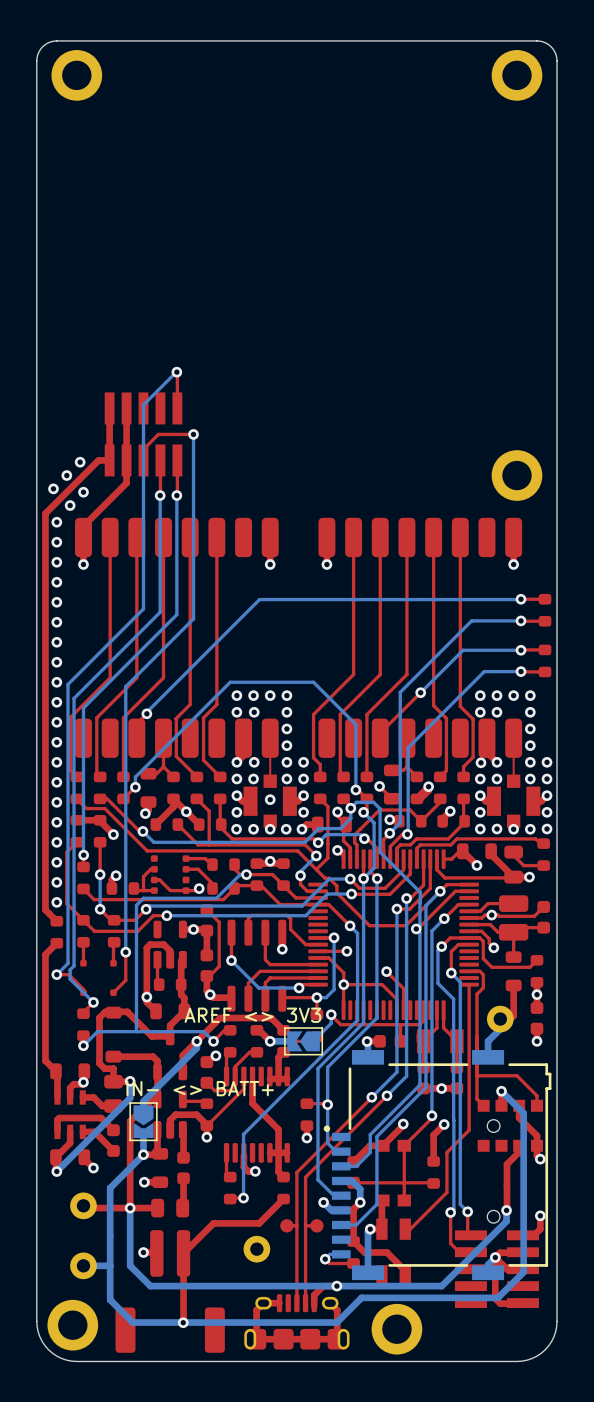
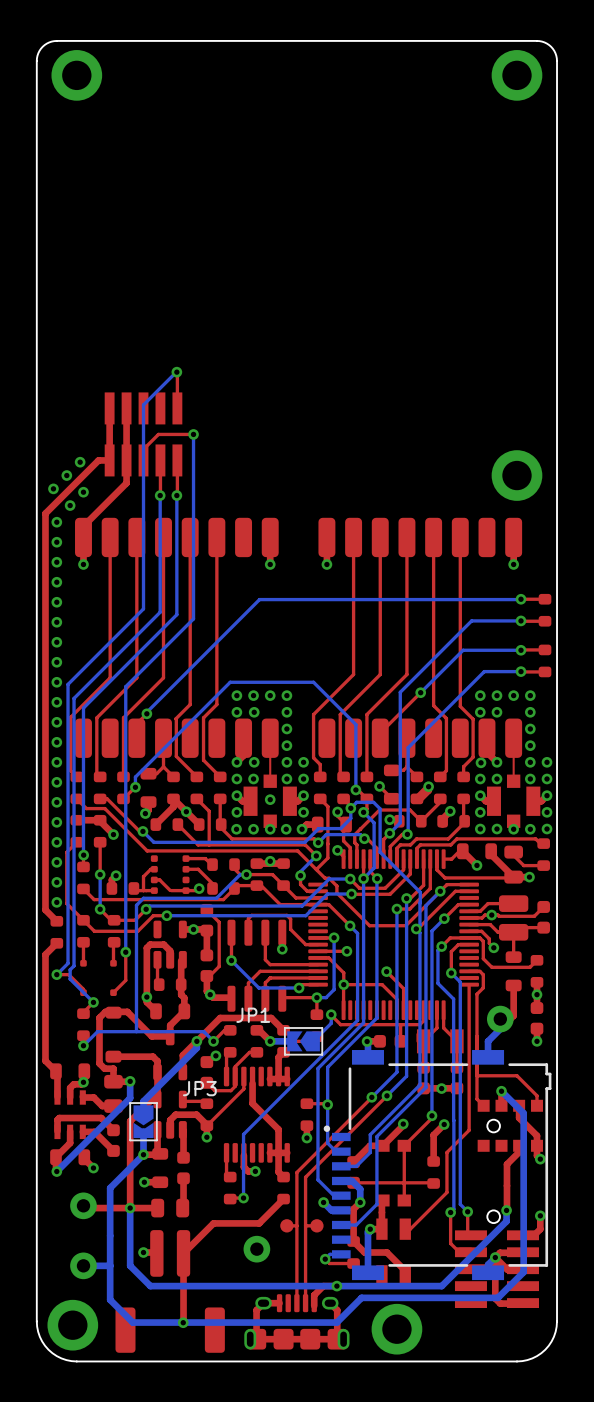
JP1 name: AREF <> 3V3 (252, 1015) -> JP1 (253, 1015)
JP3 name: IN- <> BATT+ (200, 1088) -> JP3 (199, 1088)

